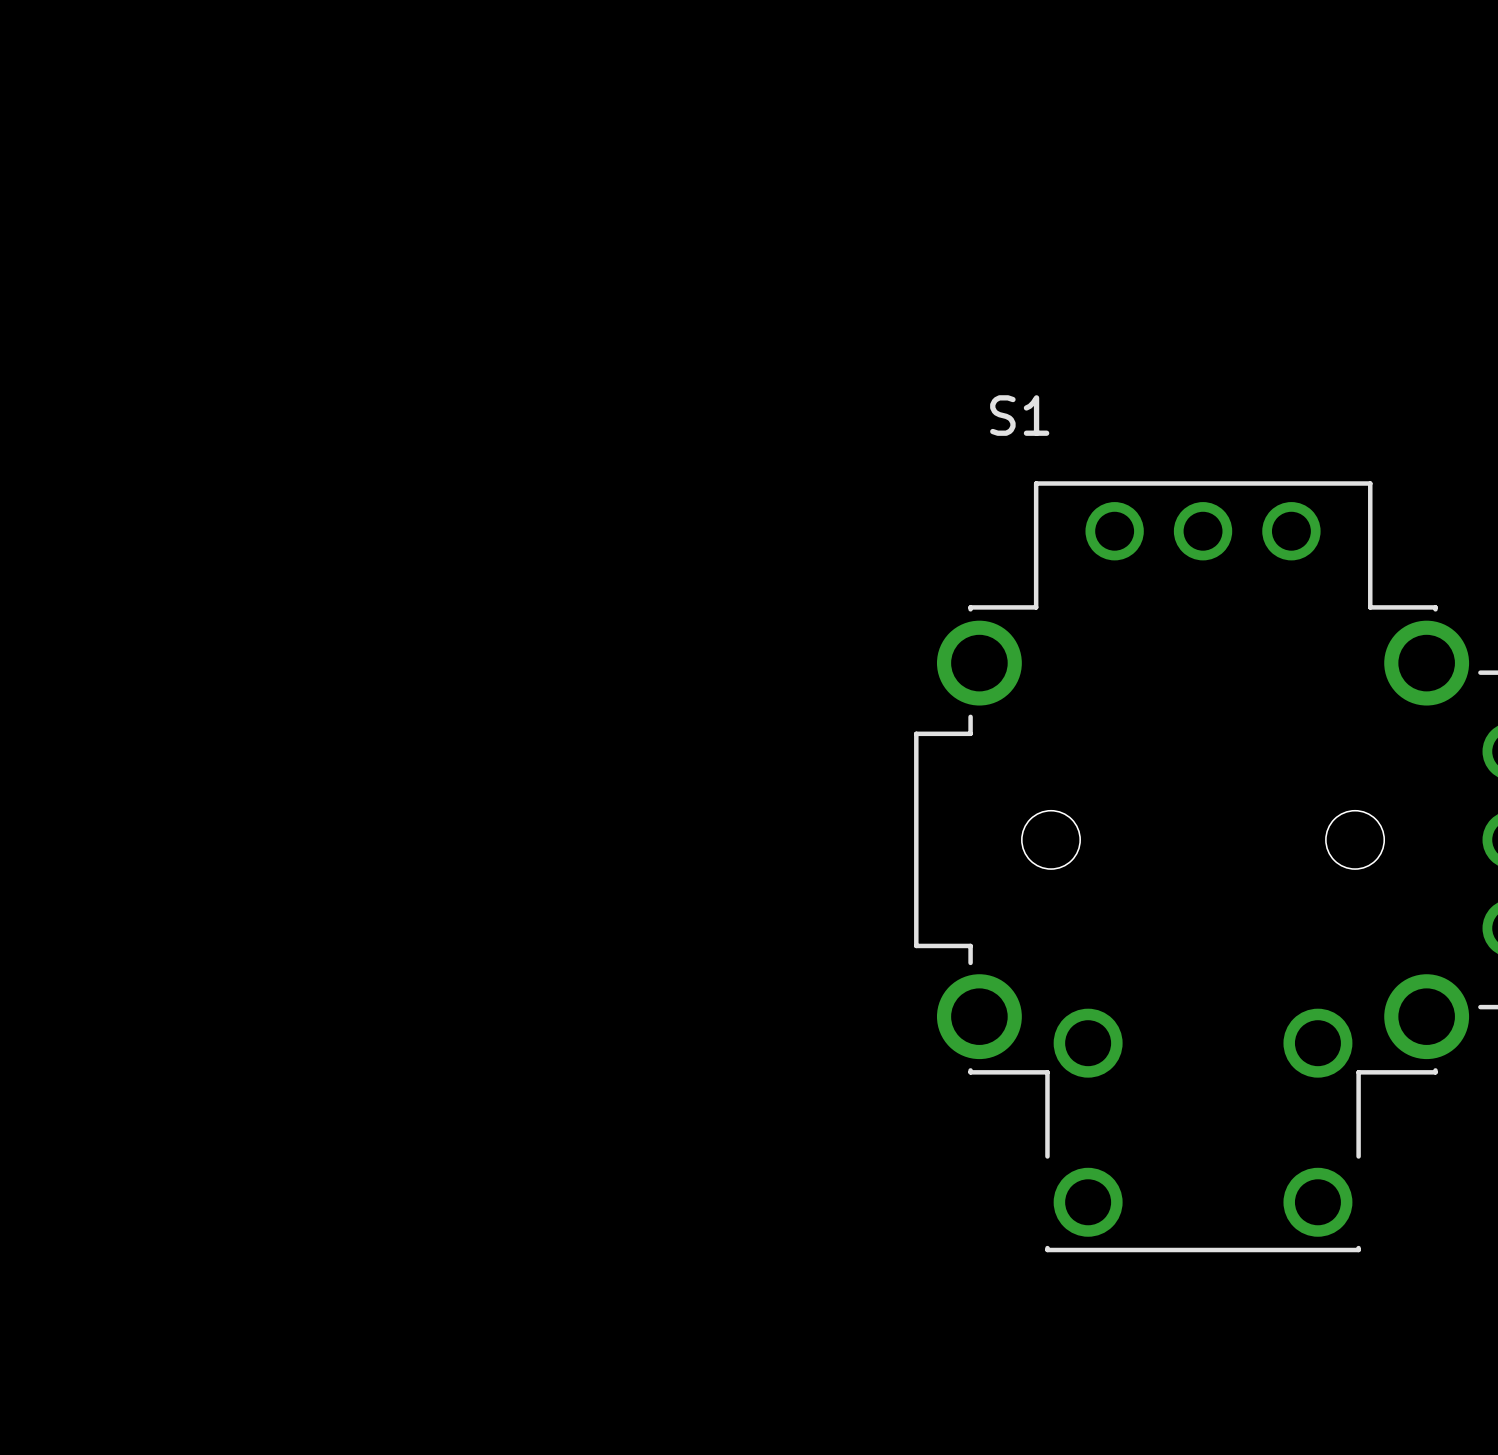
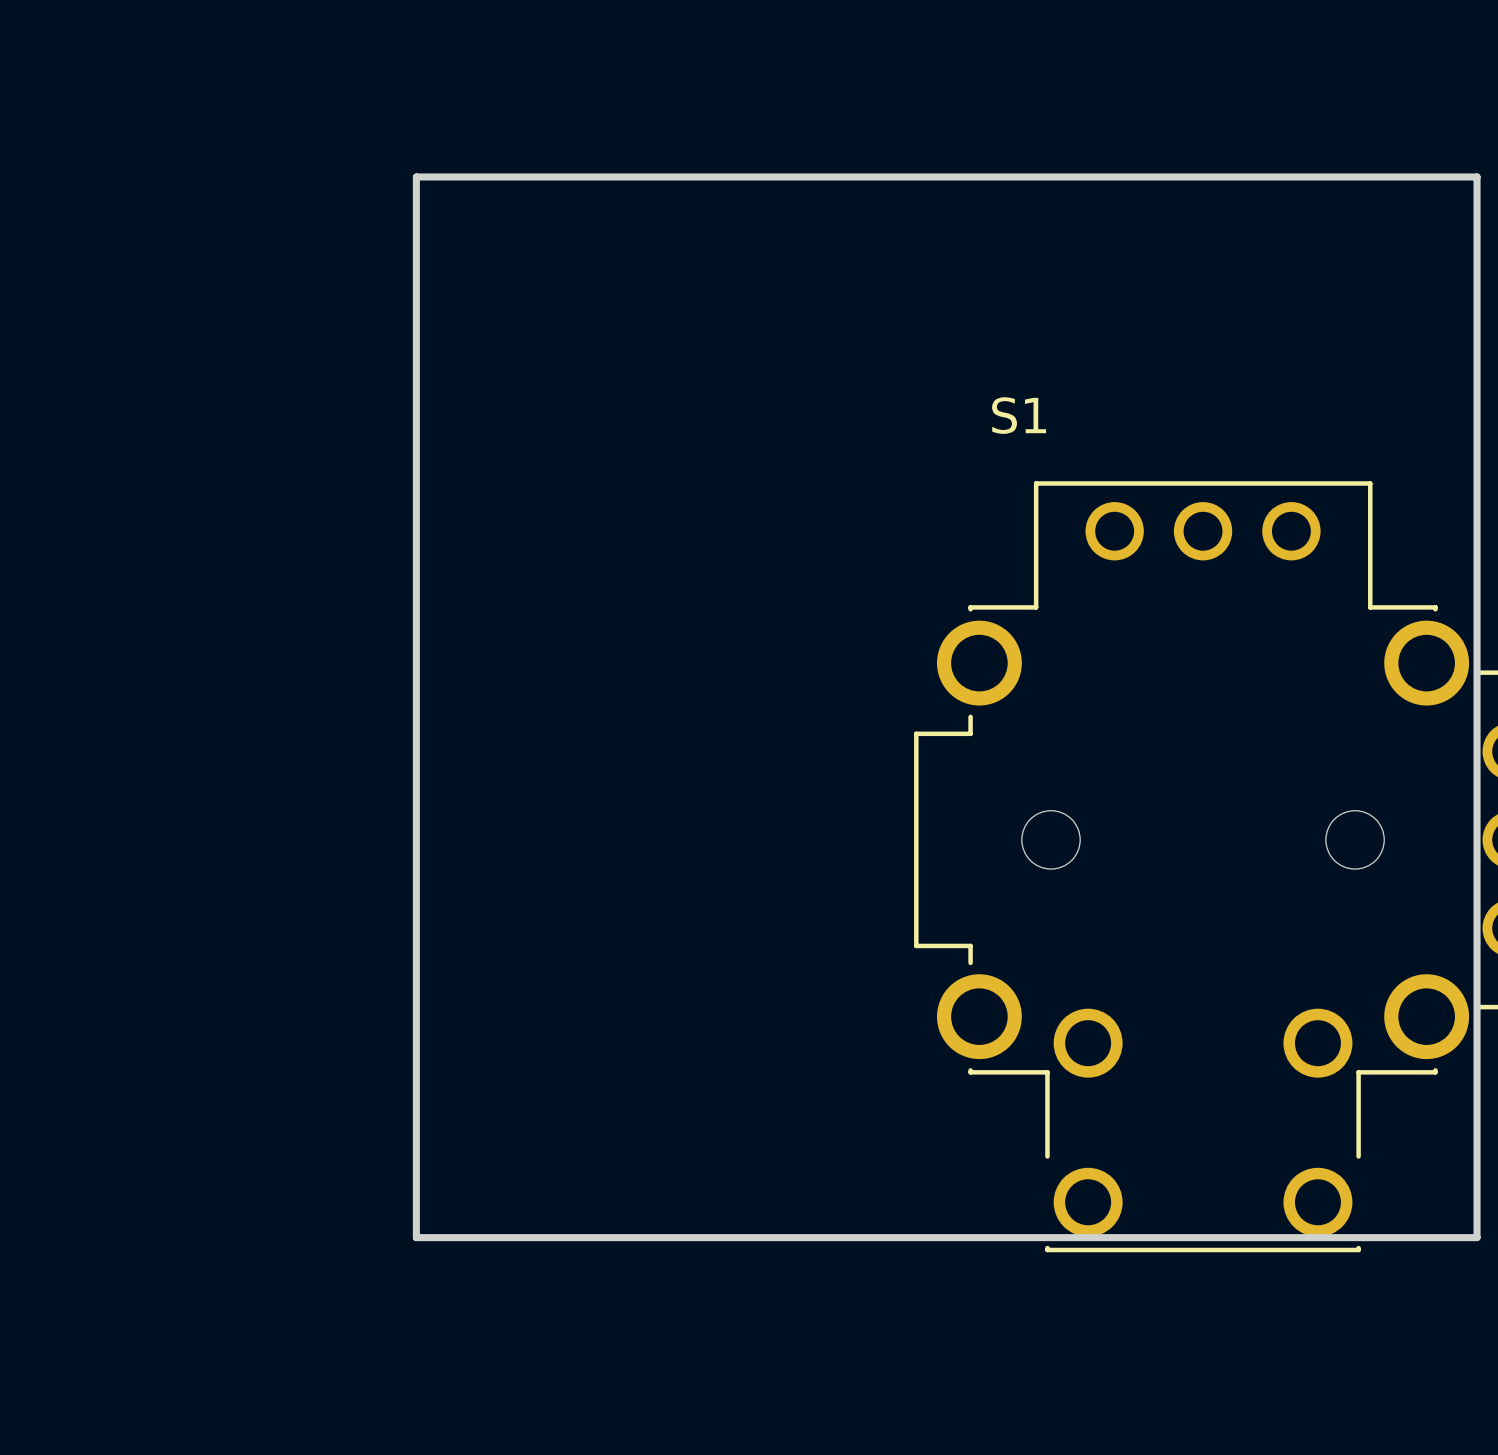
board edge: none -> (416, 176) (1477, 176) (1477, 1237) (416, 1237) (416, 176)

